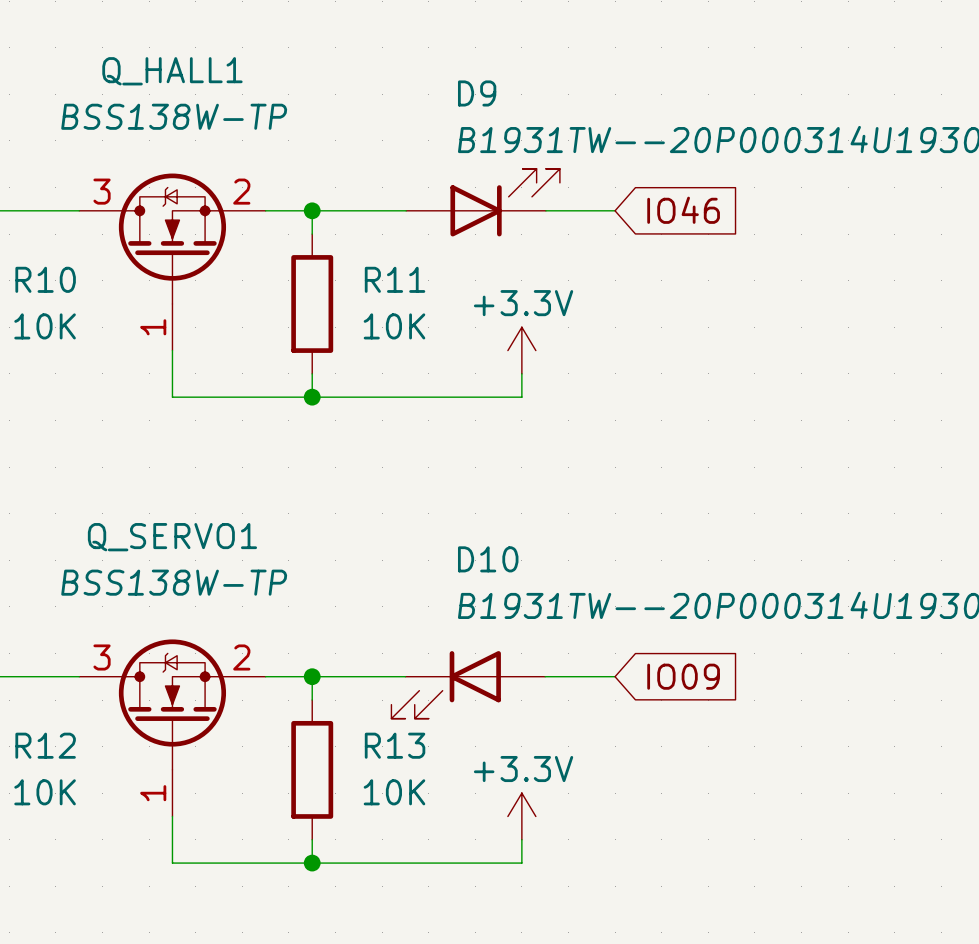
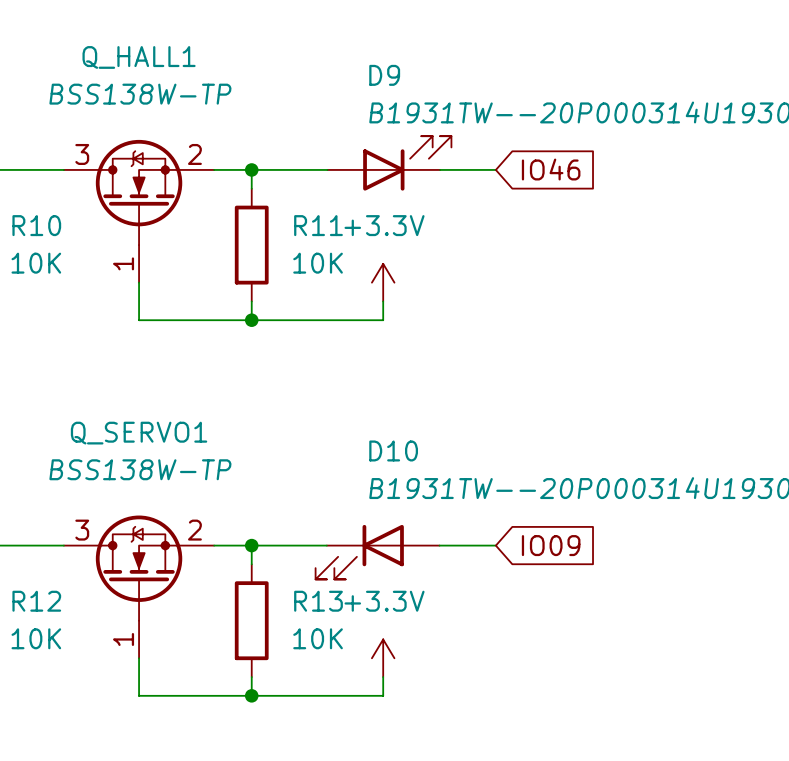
power symbol text position: +3.3V (523, 303) -> +3.3V (384, 225)
power symbol position: +3.3V (521, 350) -> +3.3V (383, 282)
wire: (521, 373) (521, 397) (475, 397) -> (383, 301) (383, 320)
power symbol text position: +3.3V (523, 769) -> +3.3V (384, 601)
power symbol position: +3.3V (521, 816) -> +3.3V (383, 658)
wire: (521, 839) (521, 863) (475, 863) -> (383, 677) (383, 695)

